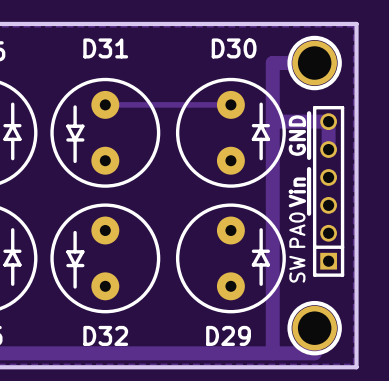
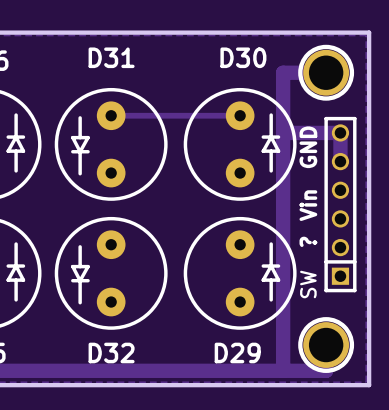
line: (309, 113) (309, 157) -> none
line: (309, 169) (309, 213) -> none
text: PA0 (297, 230) -> ? (308, 241)

